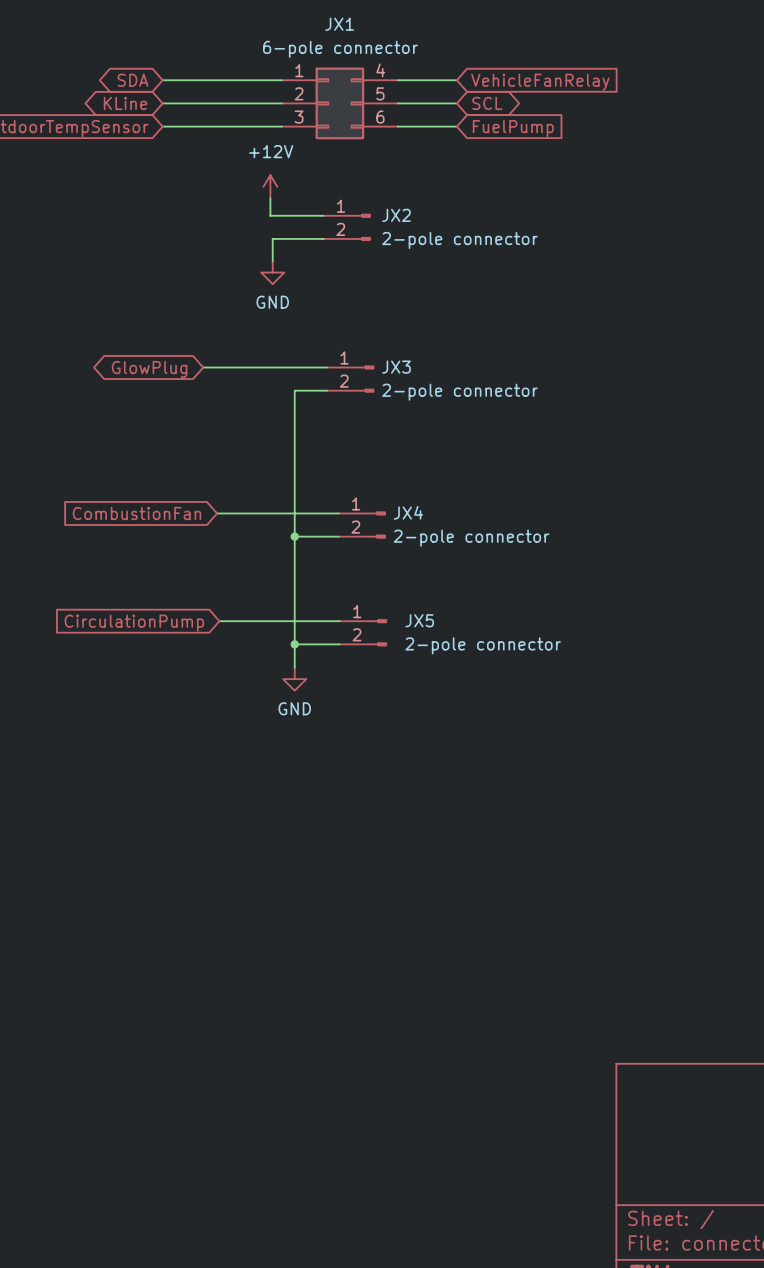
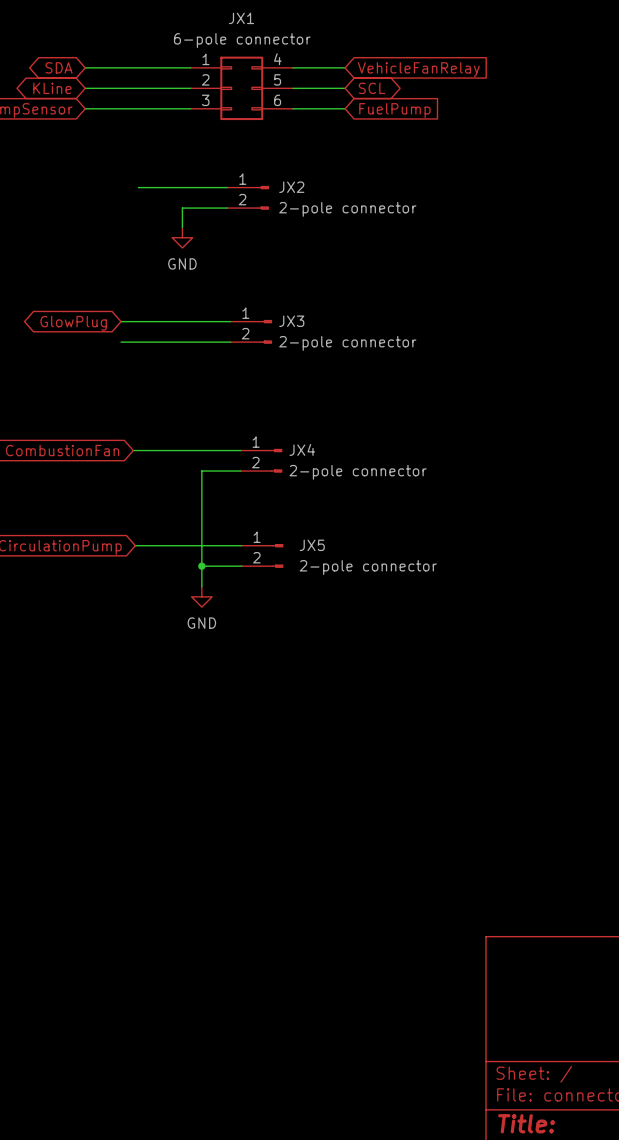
power symbol: +12V (270, 186) -> none
wire: (270, 198) (270, 215) -> (138, 187) (180, 187)
wire: (294, 390) (294, 536) -> (201, 342) (121, 342)
junction: (294, 536) -> none

